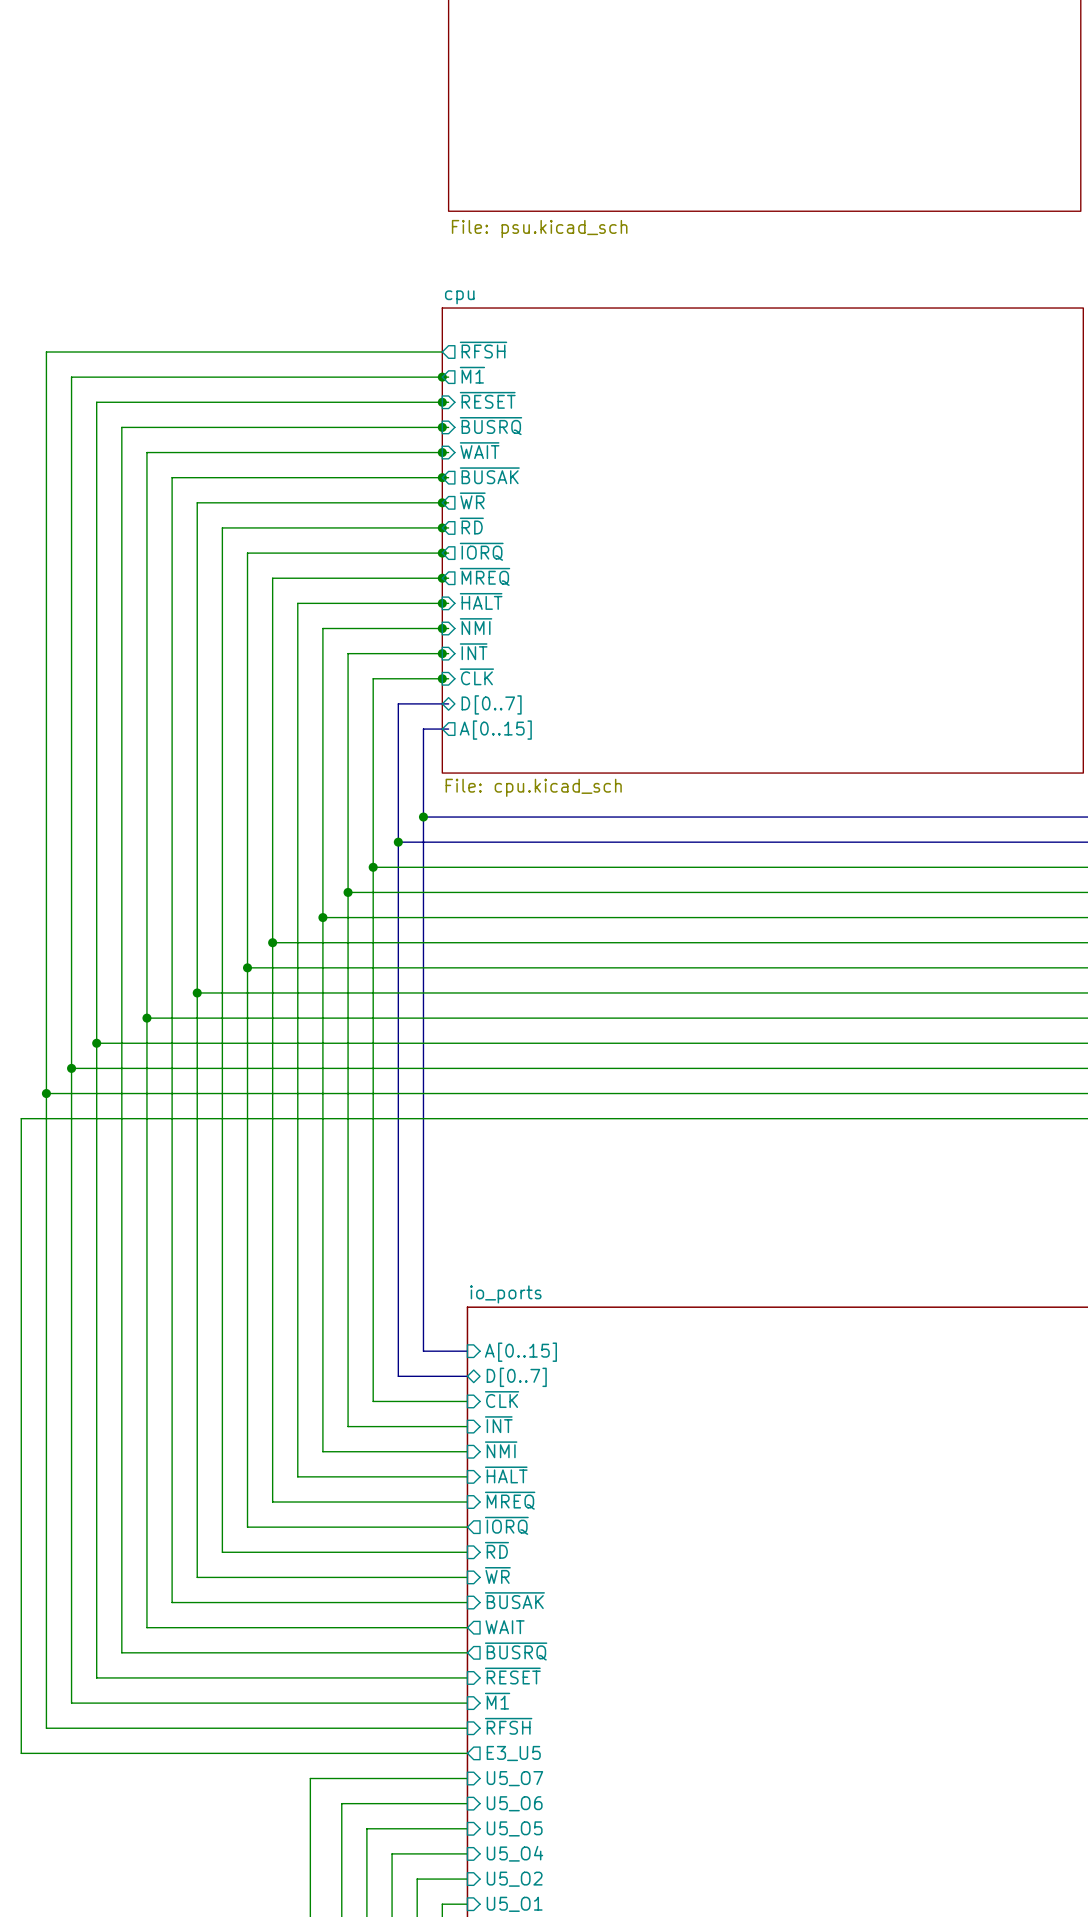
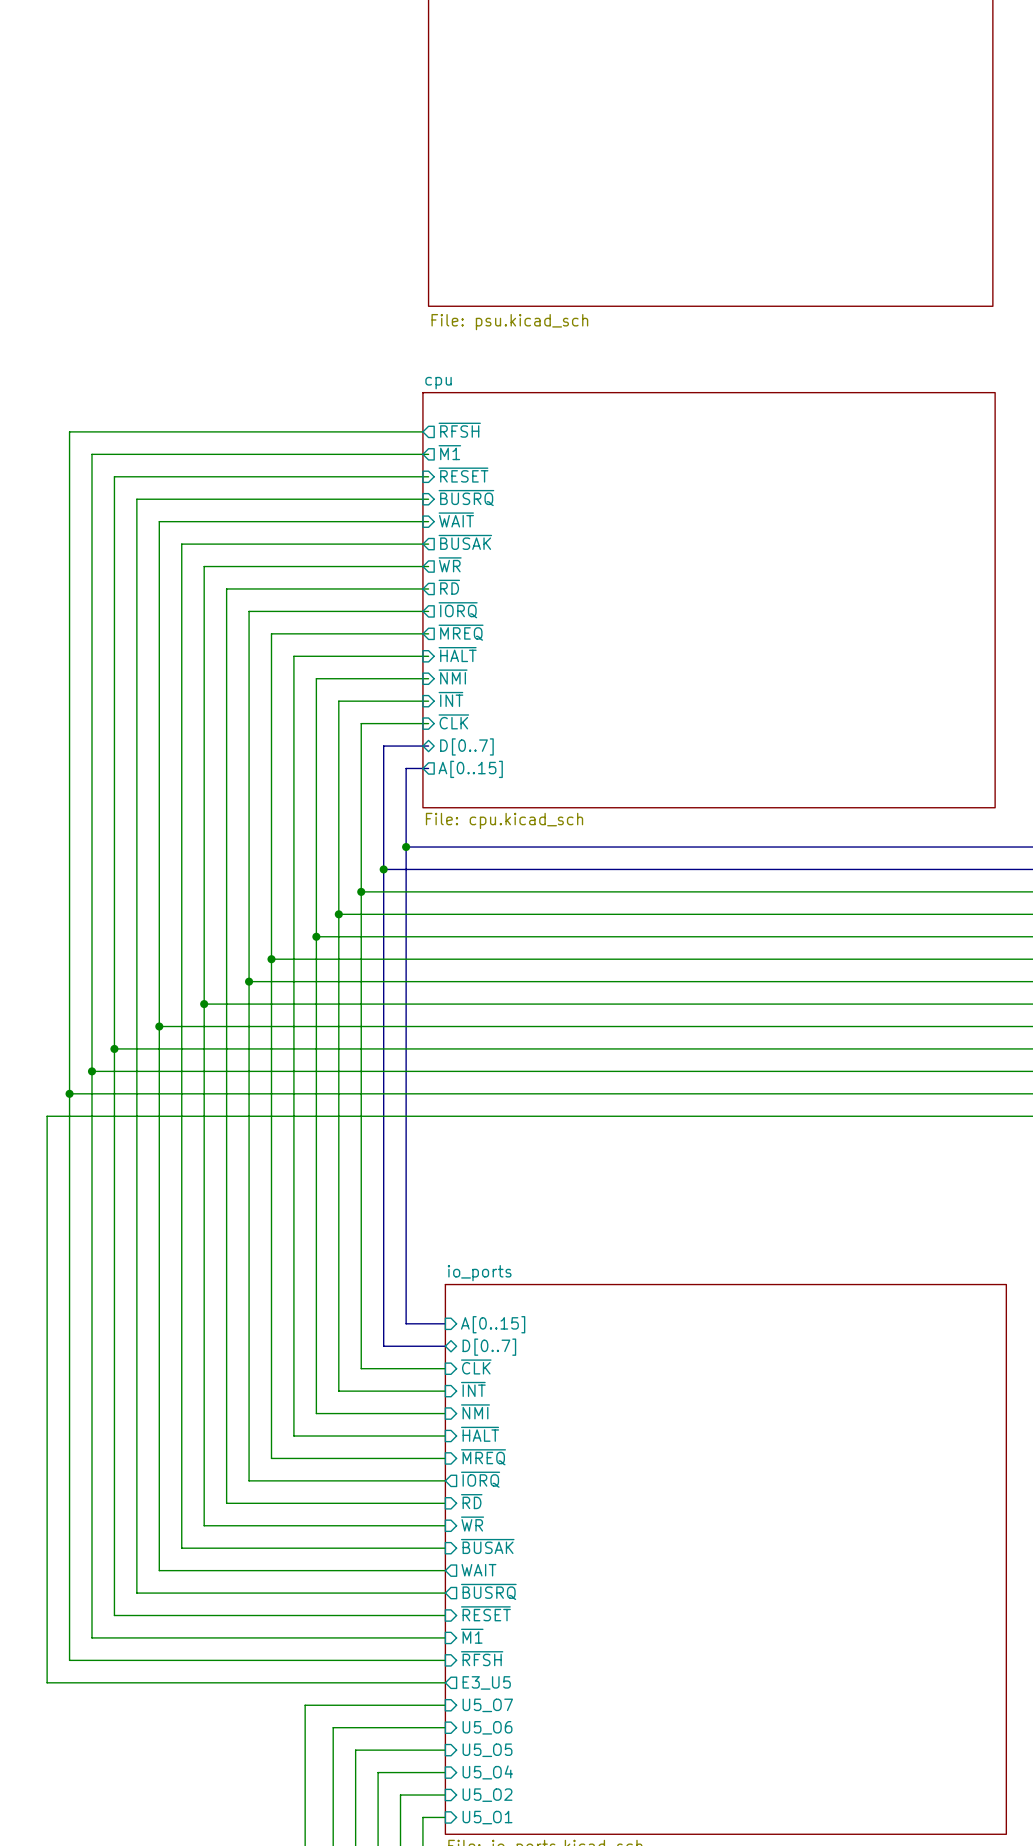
junction: (442, 377) -> none
junction: (442, 402) -> none
junction: (442, 427) -> none
junction: (442, 452) -> none
junction: (442, 477) -> none
junction: (442, 502) -> none
junction: (442, 527) -> none
junction: (442, 553) -> none
junction: (442, 578) -> none
junction: (442, 603) -> none
junction: (442, 628) -> none
junction: (442, 653) -> none
junction: (442, 678) -> none

